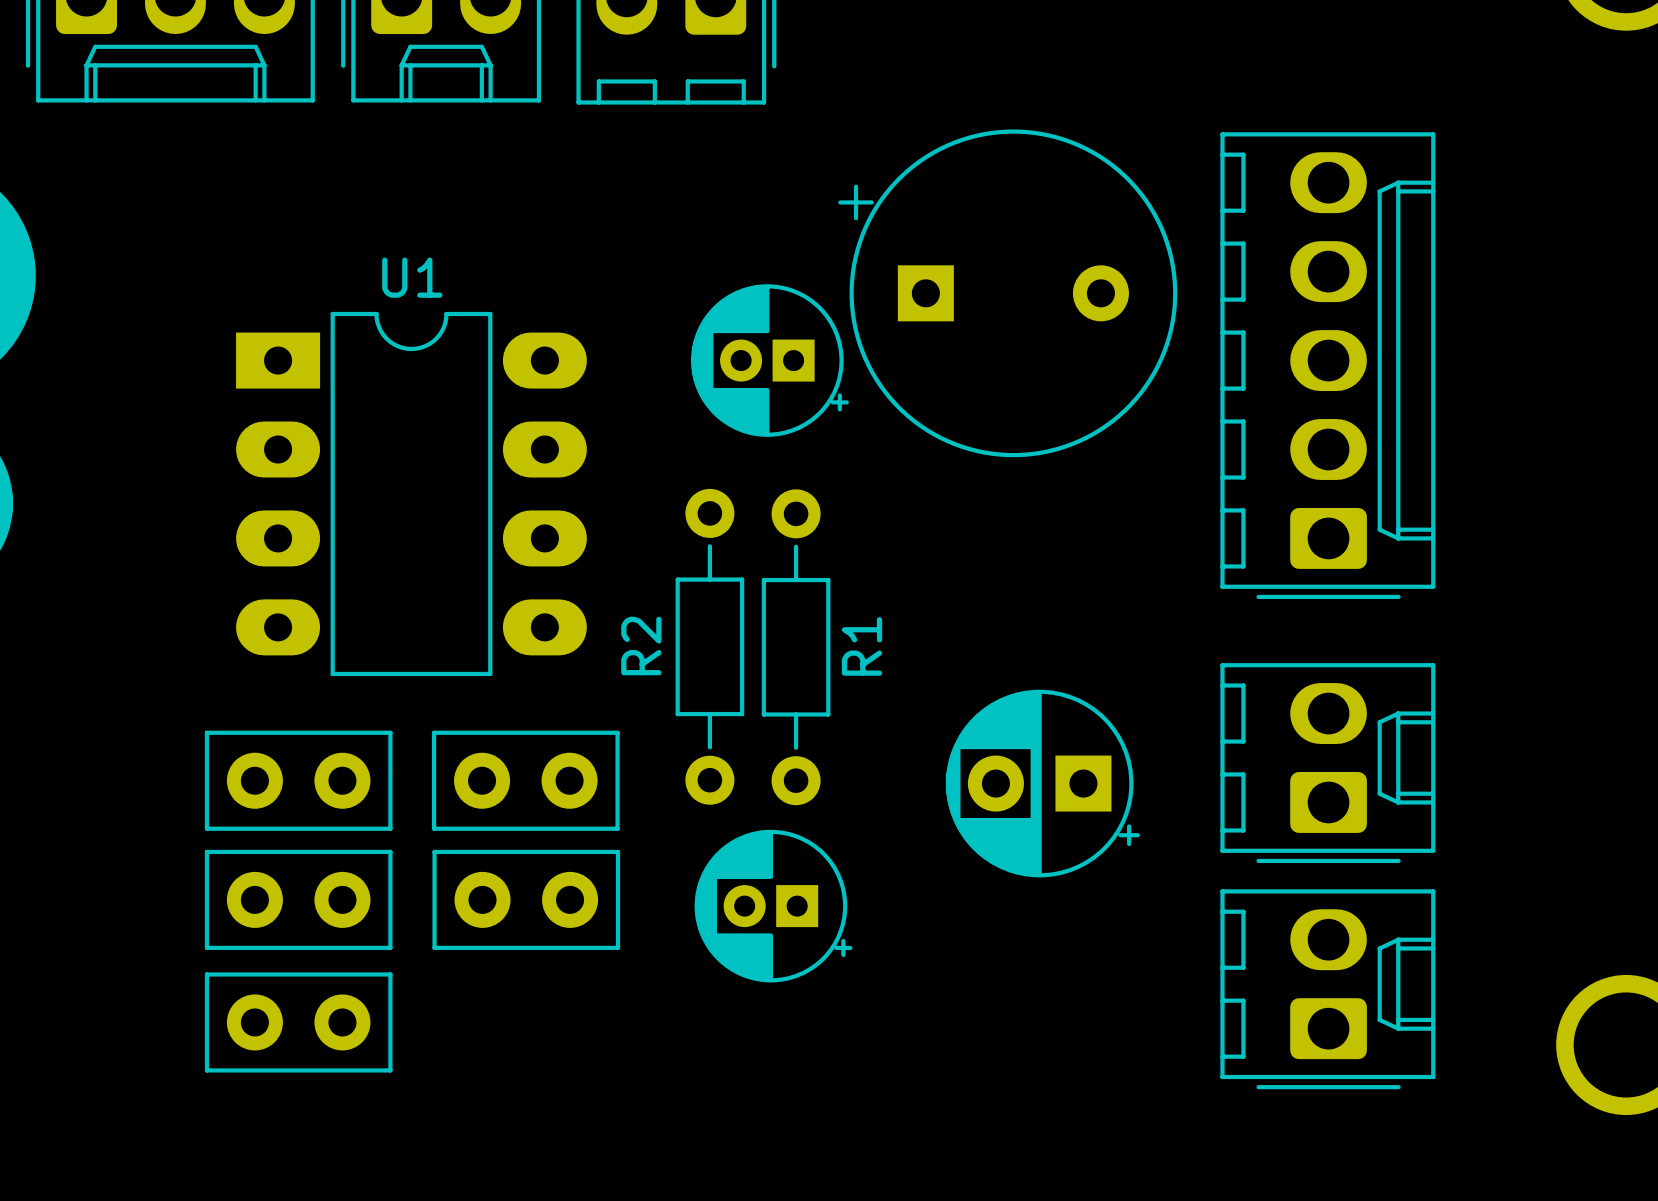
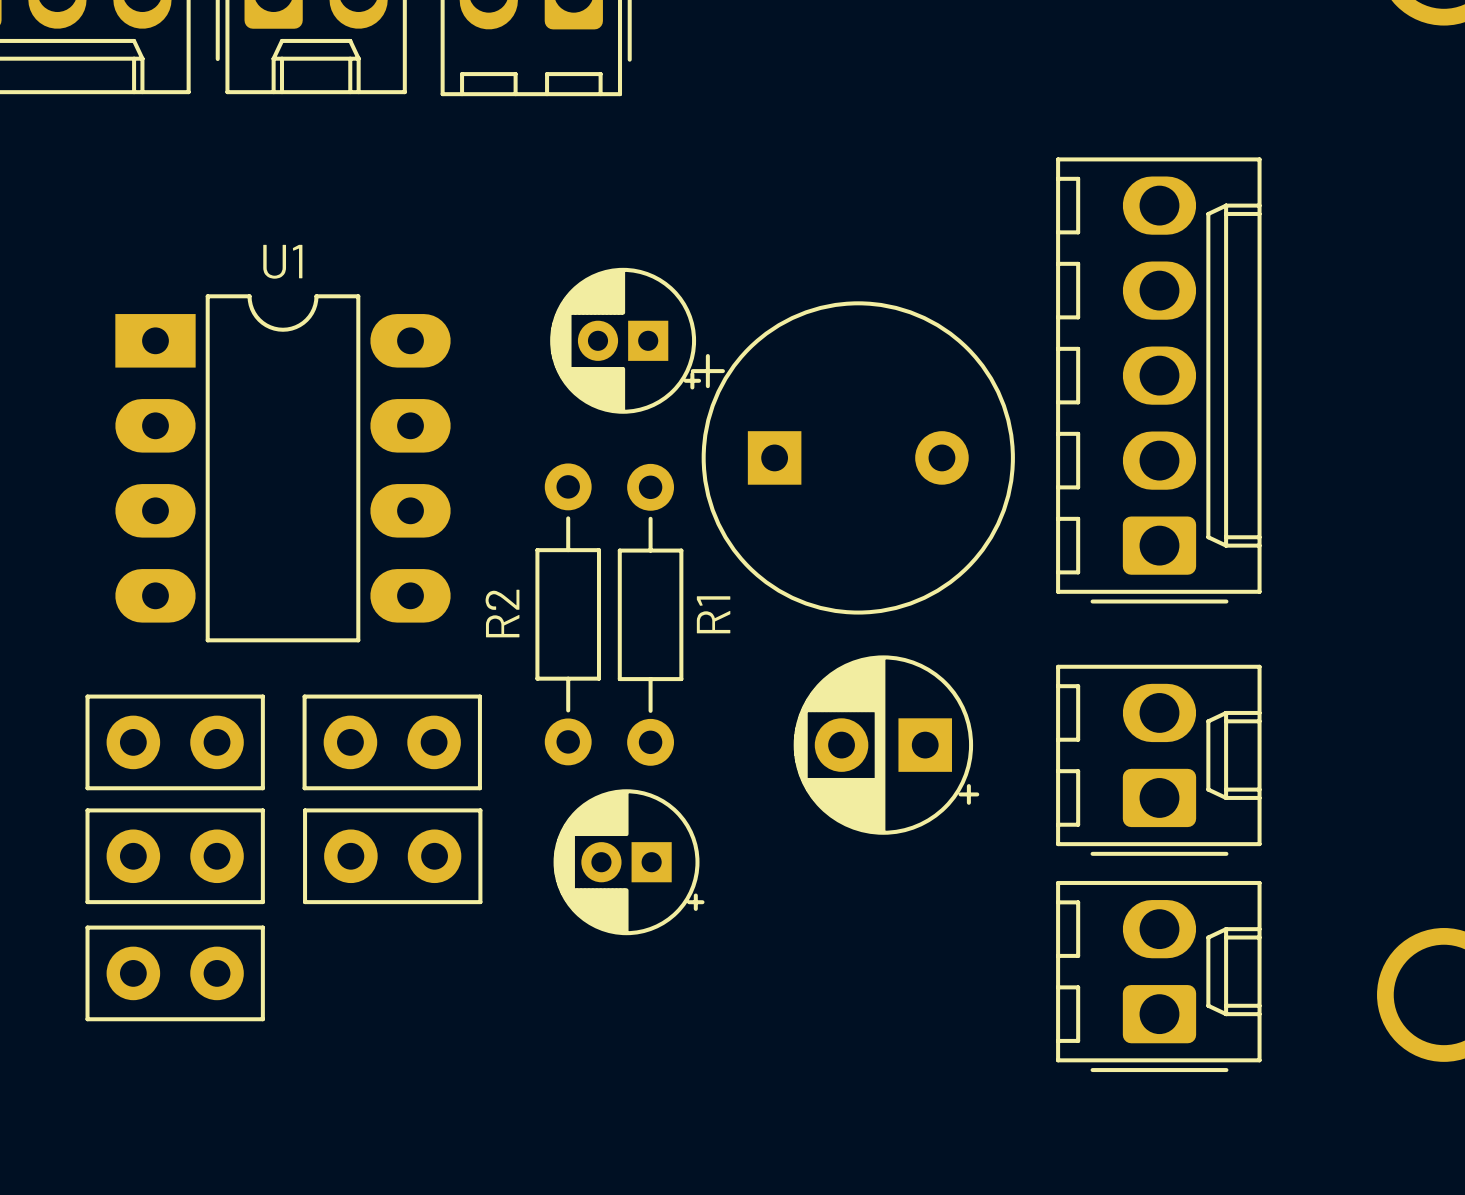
part position: (1007, 293) -> (852, 457)
part position: (1327, 365) -> (1158, 380)
part position: (1327, 763) -> (1158, 760)
part position: (1327, 989) -> (1158, 976)

